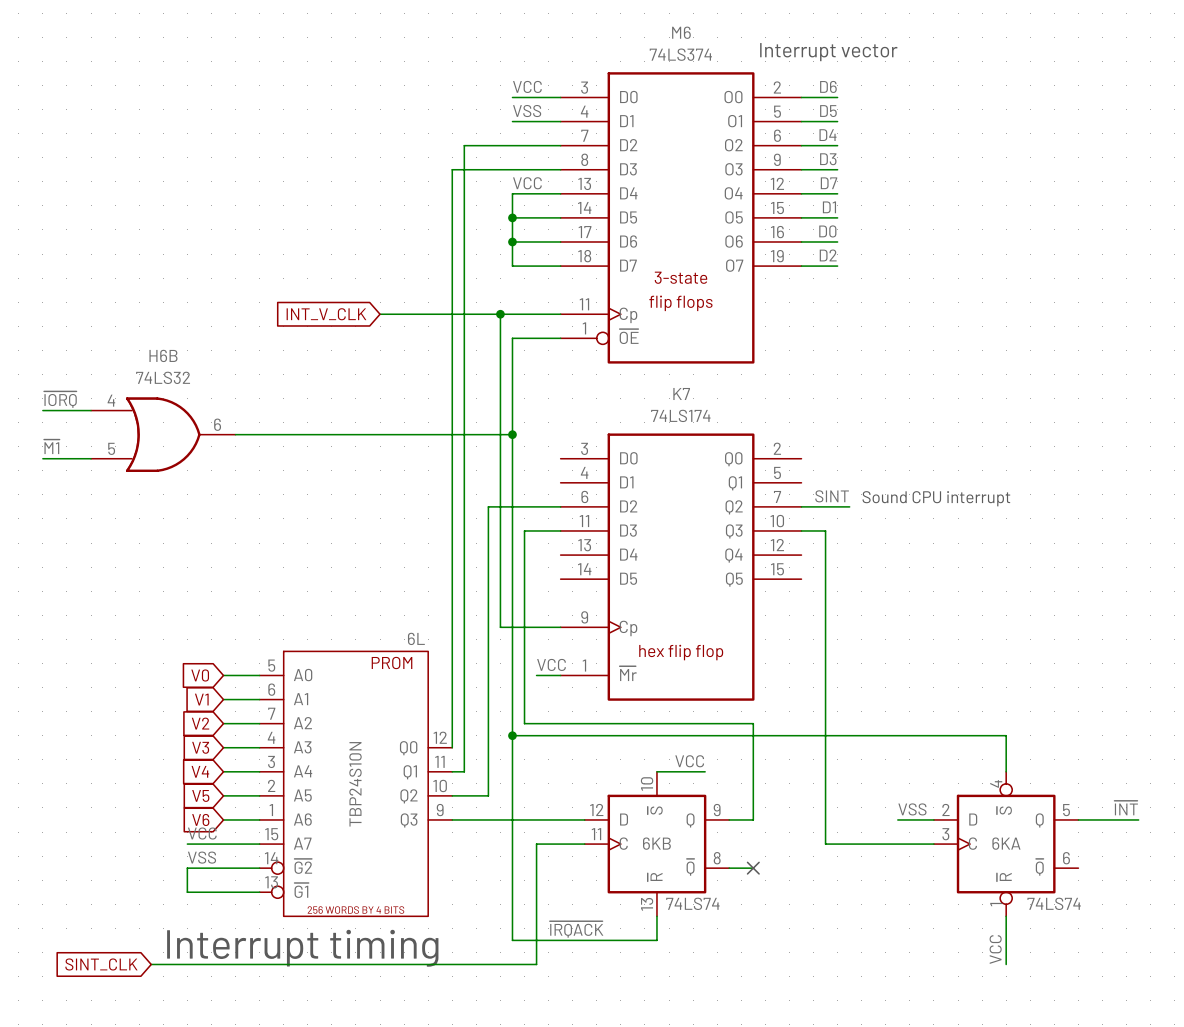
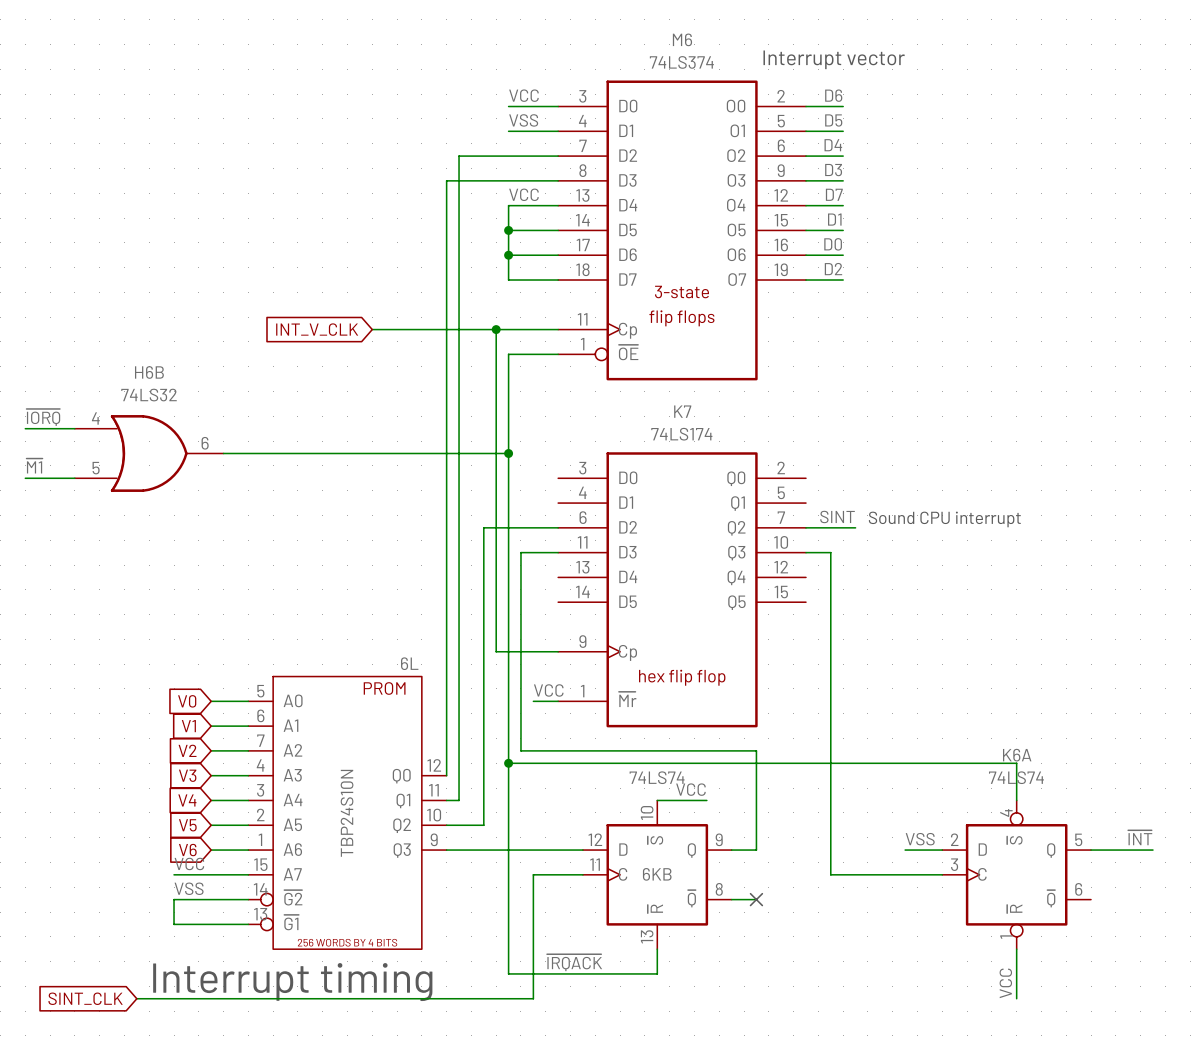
6KA name: 6KA (1006, 843) -> K6A (1017, 755)
6KB value position: 74LS74 (692, 903) -> 74LS74 (657, 777)
6KA value position: 74LS74 (1054, 903) -> 74LS74 (1016, 777)

